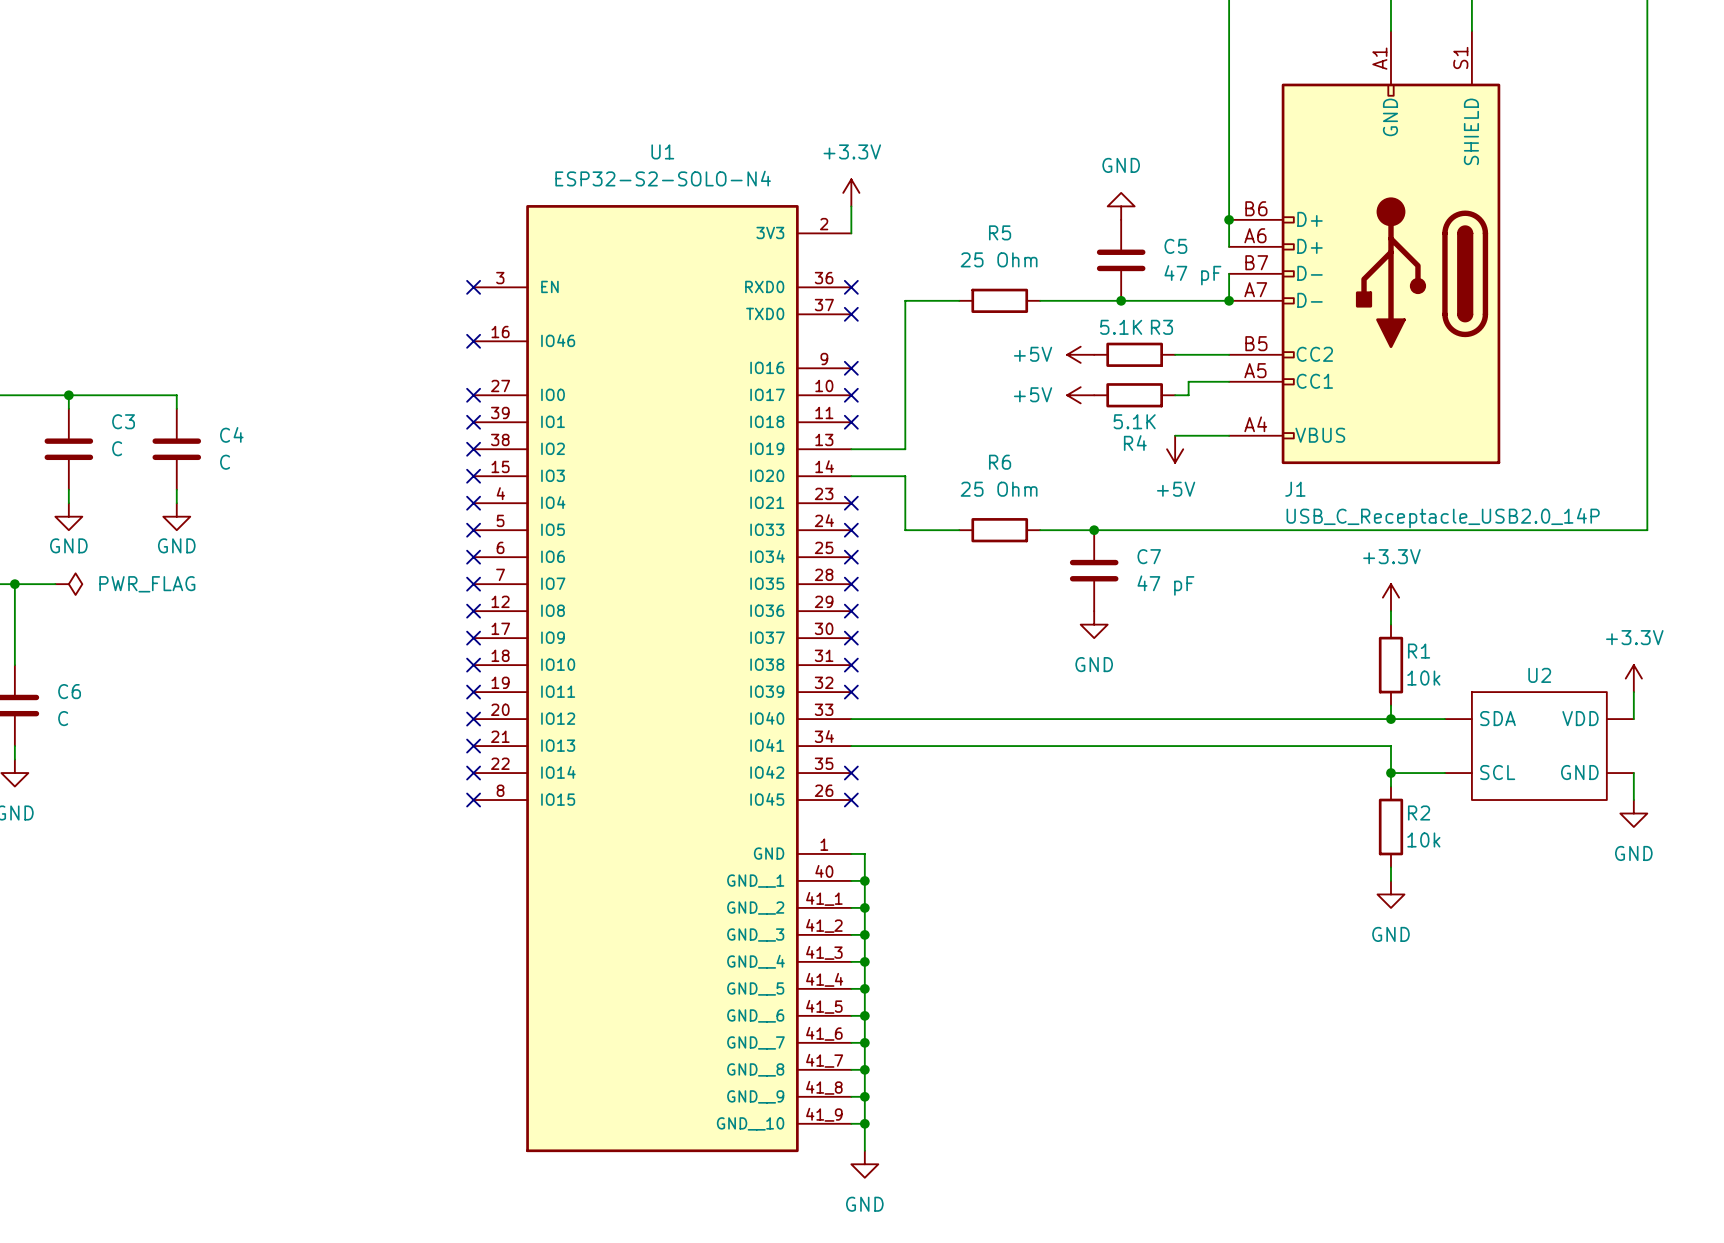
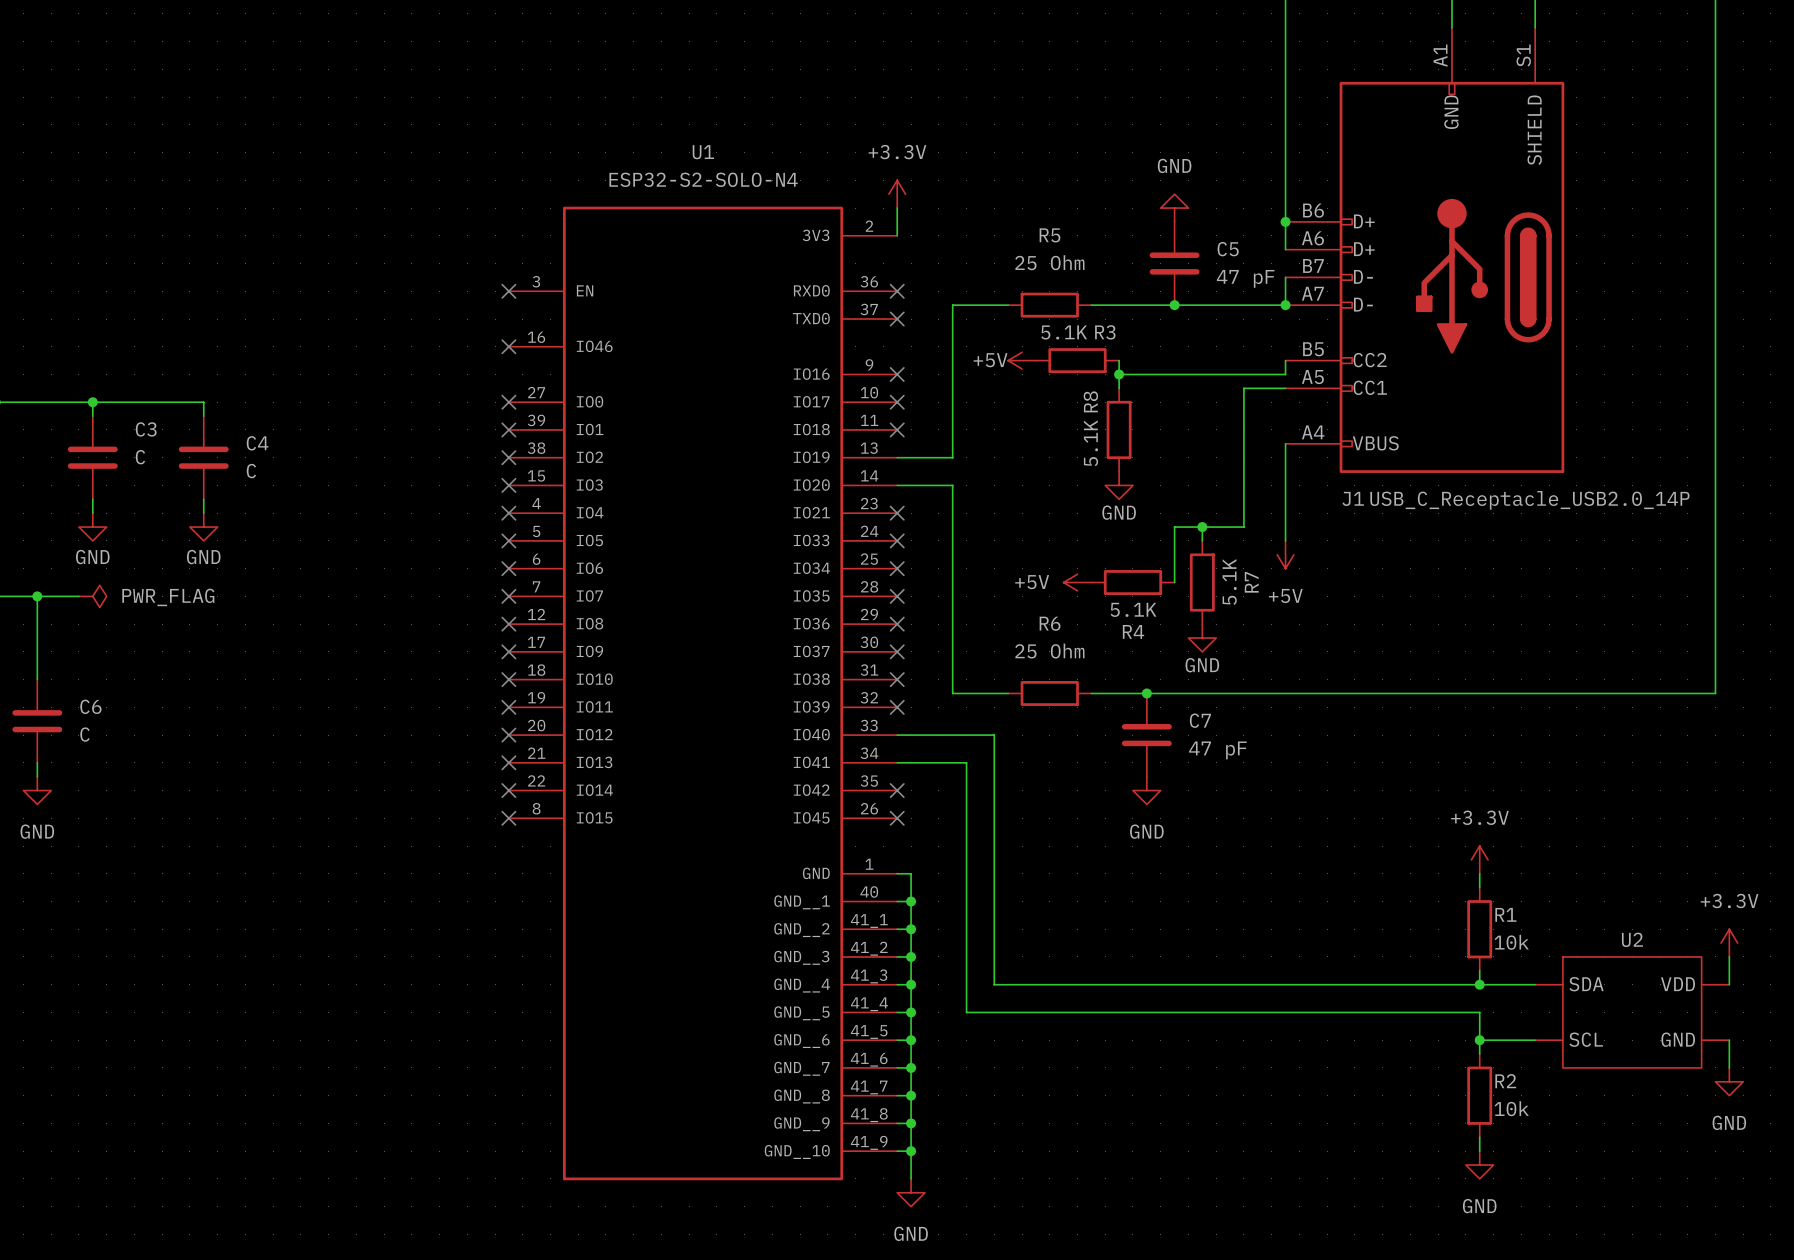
power symbol: none -> +5V (1022, 360)
wire: none -> (1119, 360) (1119, 388)
power symbol: +5V (1080, 354) -> none
R3 position: (1134, 354) -> (1077, 360)
wire: (1175, 354) (1229, 354) -> (1119, 374) (1285, 374) (1285, 360)
junction: none -> (1119, 374)
power symbol: +5V (1080, 395) -> none
R4 position: (1134, 395) -> (1132, 582)
wire: (1175, 395) (1188, 395) -> (1174, 582) (1174, 527) (1243, 527) (1243, 402)
R8: none -> 5.1K (1119, 429)
wire: (1175, 435) (1229, 435) -> (1285, 540) (1285, 443)
power symbol: +5V (1175, 449) -> none
power symbol: none -> GND (1119, 485)
wire: none -> (1202, 527) (1202, 540)
J1 value position: USB_C_Receptacle_USB2.0_14P (1443, 518) -> USB_C_Receptacle_USB2.0_14P (1529, 500)
wire: (905, 530) (959, 530) -> (952, 540) (952, 693) (1008, 693)
R6 position: (999, 530) -> (1049, 693)
wire: (1040, 530) (1647, 530) -> (1091, 693) (1715, 693) (1715, 540)
junction position: (1094, 530) -> (1202, 527)
power symbol: none -> +5V (1285, 554)
power symbol: none -> +5V (1077, 582)
C7 position: (1094, 570) -> (1146, 735)
R7: none -> 5.1K (1202, 582)
power symbol: +3.3V (1390, 597) -> none
wire: (1390, 611) (1390, 624) -> (1479, 873) (1479, 887)
power symbol position: GND (1094, 624) -> GND (1202, 638)
power symbol text position: GND (1094, 664) -> GND (1202, 665)
R1 position: (1390, 665) -> (1479, 929)
junction: none -> (1146, 693)
power symbol: +3.3V (1633, 678) -> none
wire: (1633, 692) (1633, 719) -> (1729, 956) (1729, 984)
wire: (1390, 705) (1390, 719) -> (1479, 970) (1479, 984)
wire: (945, 719) (1444, 719) -> (994, 735) (994, 984) (1535, 984)
junction: (1390, 719) -> none
wire: (918, 746) (1390, 746) (1390, 786) -> (966, 762) (966, 1012) (1479, 1012) (1479, 1054)
U2 position: (1539, 746) -> (1632, 1012)
power symbol: none -> GND (1146, 790)
wire: (1390, 773) (1444, 773) -> (1479, 1040) (1535, 1040)
junction: (1390, 773) -> none
wire: (1633, 773) (1633, 800) -> (1729, 1040) (1729, 1067)
power symbol: GND (1633, 813) -> none
R2 position: (1390, 826) -> (1479, 1095)
power symbol: none -> +3.3V (1479, 859)
wire: (1390, 867) (1390, 880) -> (1479, 1137) (1479, 1151)
power symbol: GND (1390, 894) -> none
power symbol: none -> +3.3V (1729, 943)
junction: none -> (1479, 984)
junction: none -> (1479, 1040)
power symbol: none -> GND (1729, 1081)
power symbol: none -> GND (1479, 1165)

